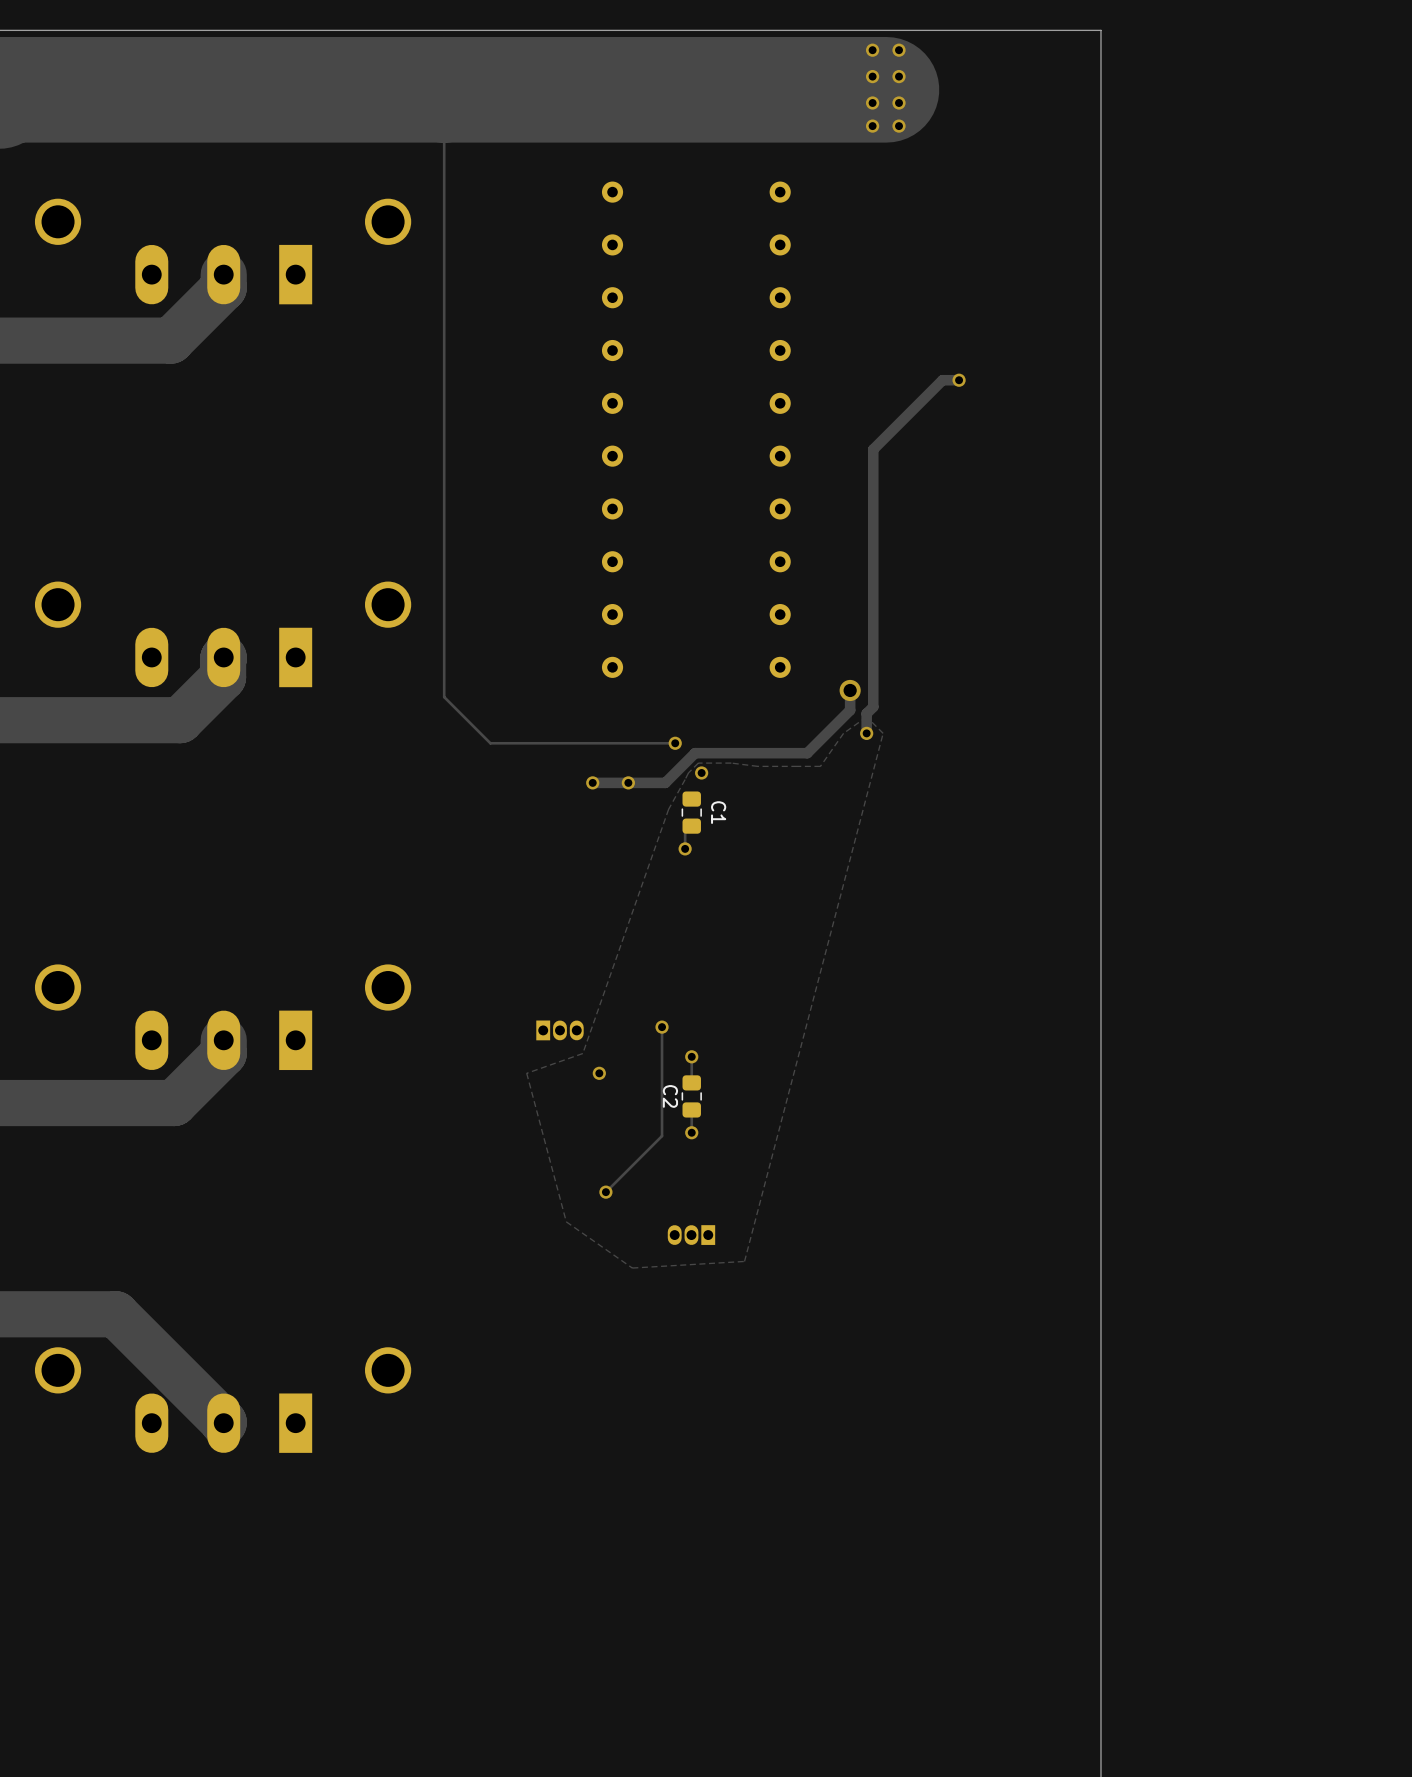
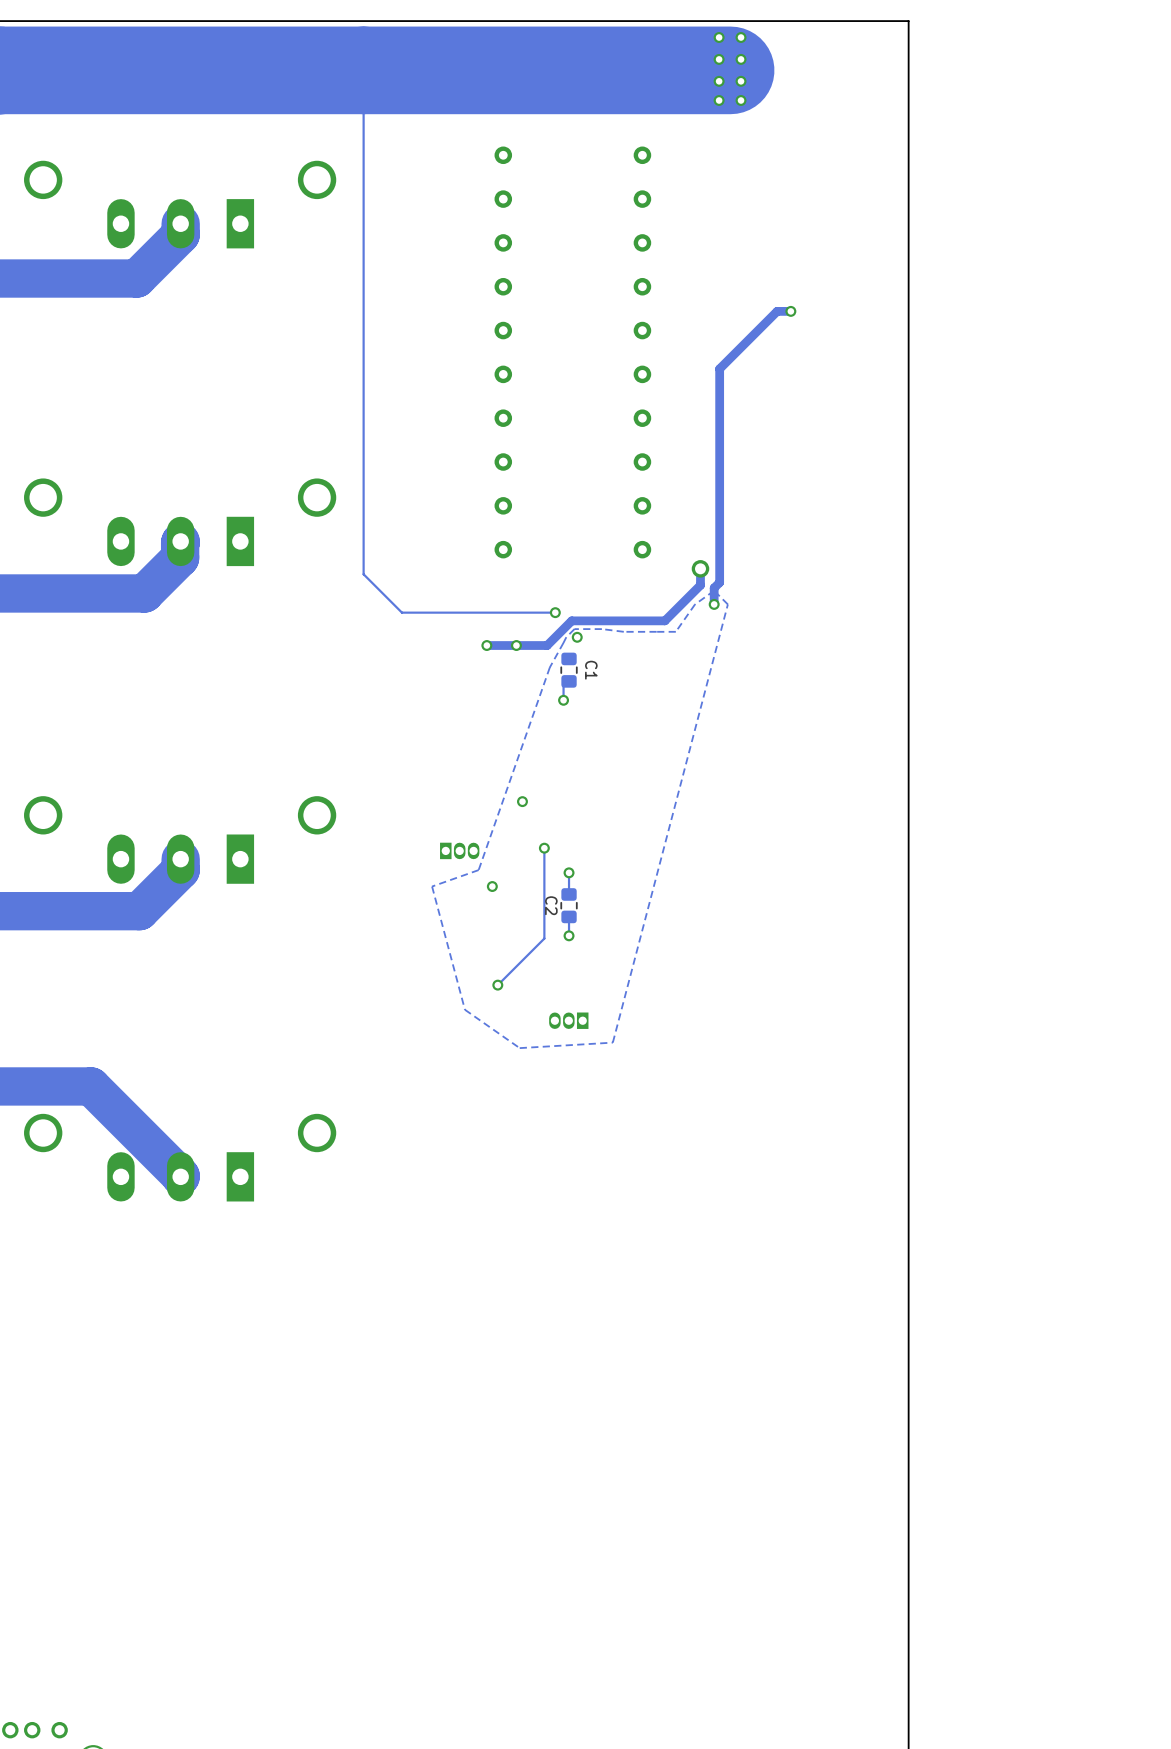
via: none -> (522, 801)

